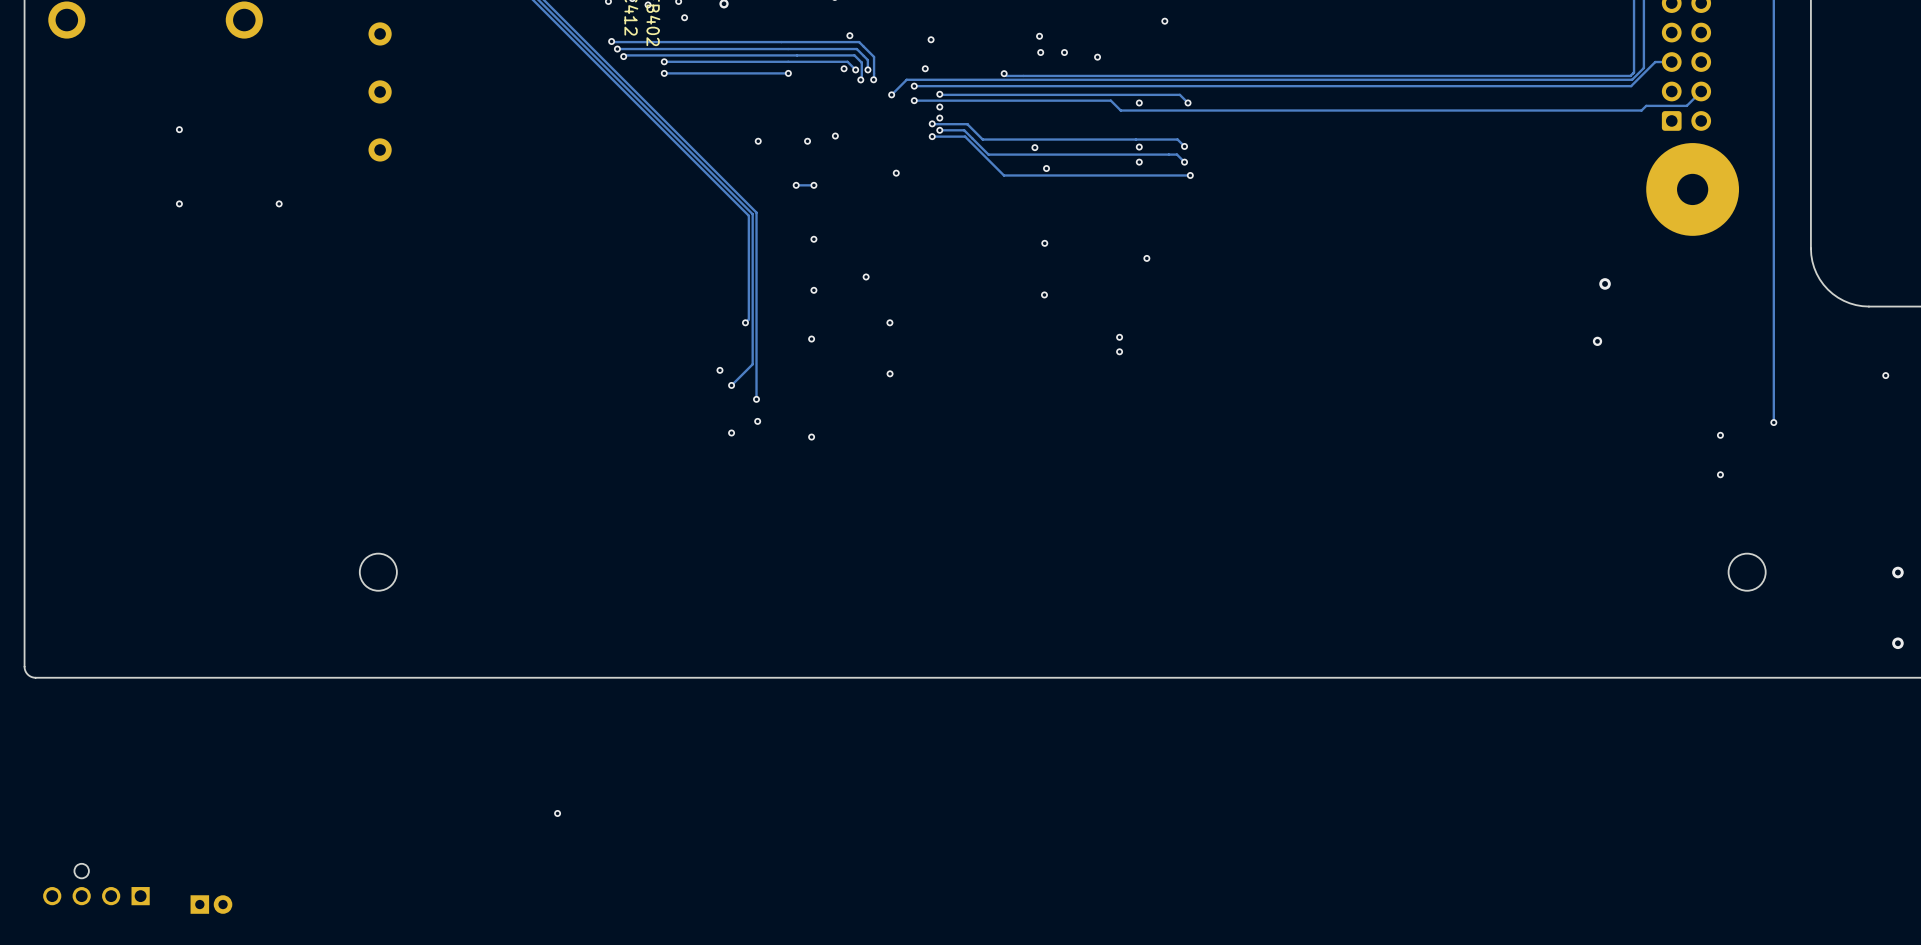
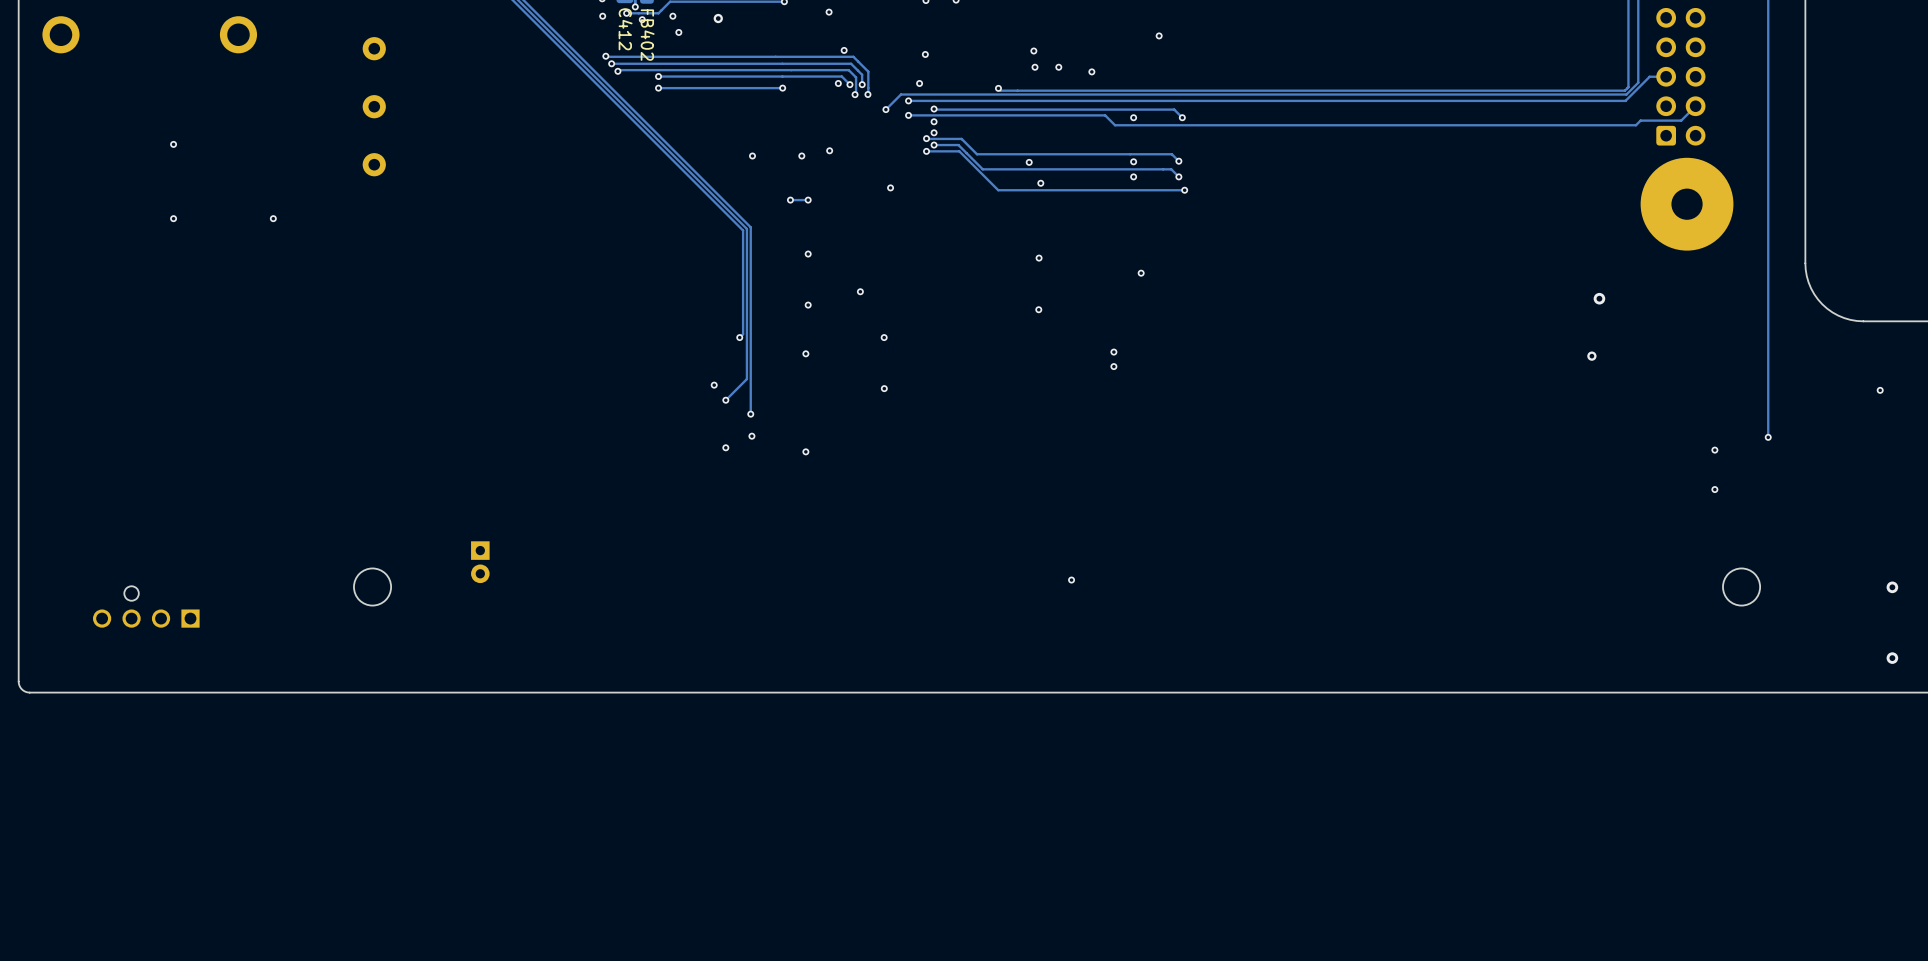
part: none -> (480, 562)
via: none -> (1071, 580)
part: none -> (146, 606)
via: (557, 813) -> none
part: (96, 884) -> none
part: (211, 904) -> none

